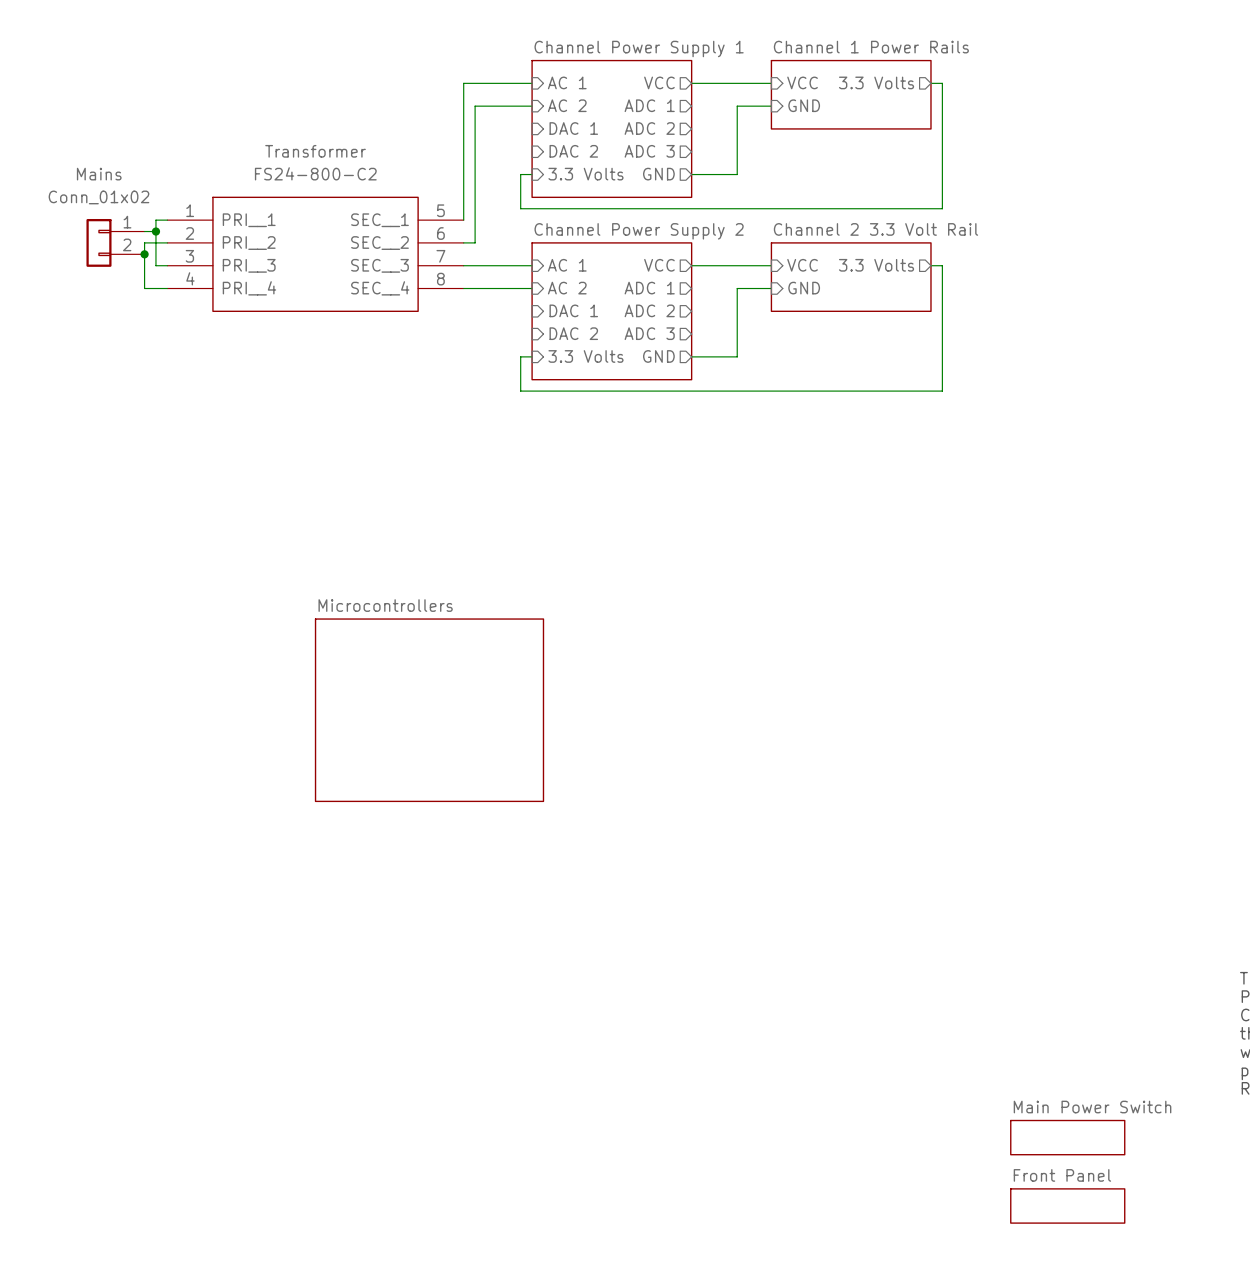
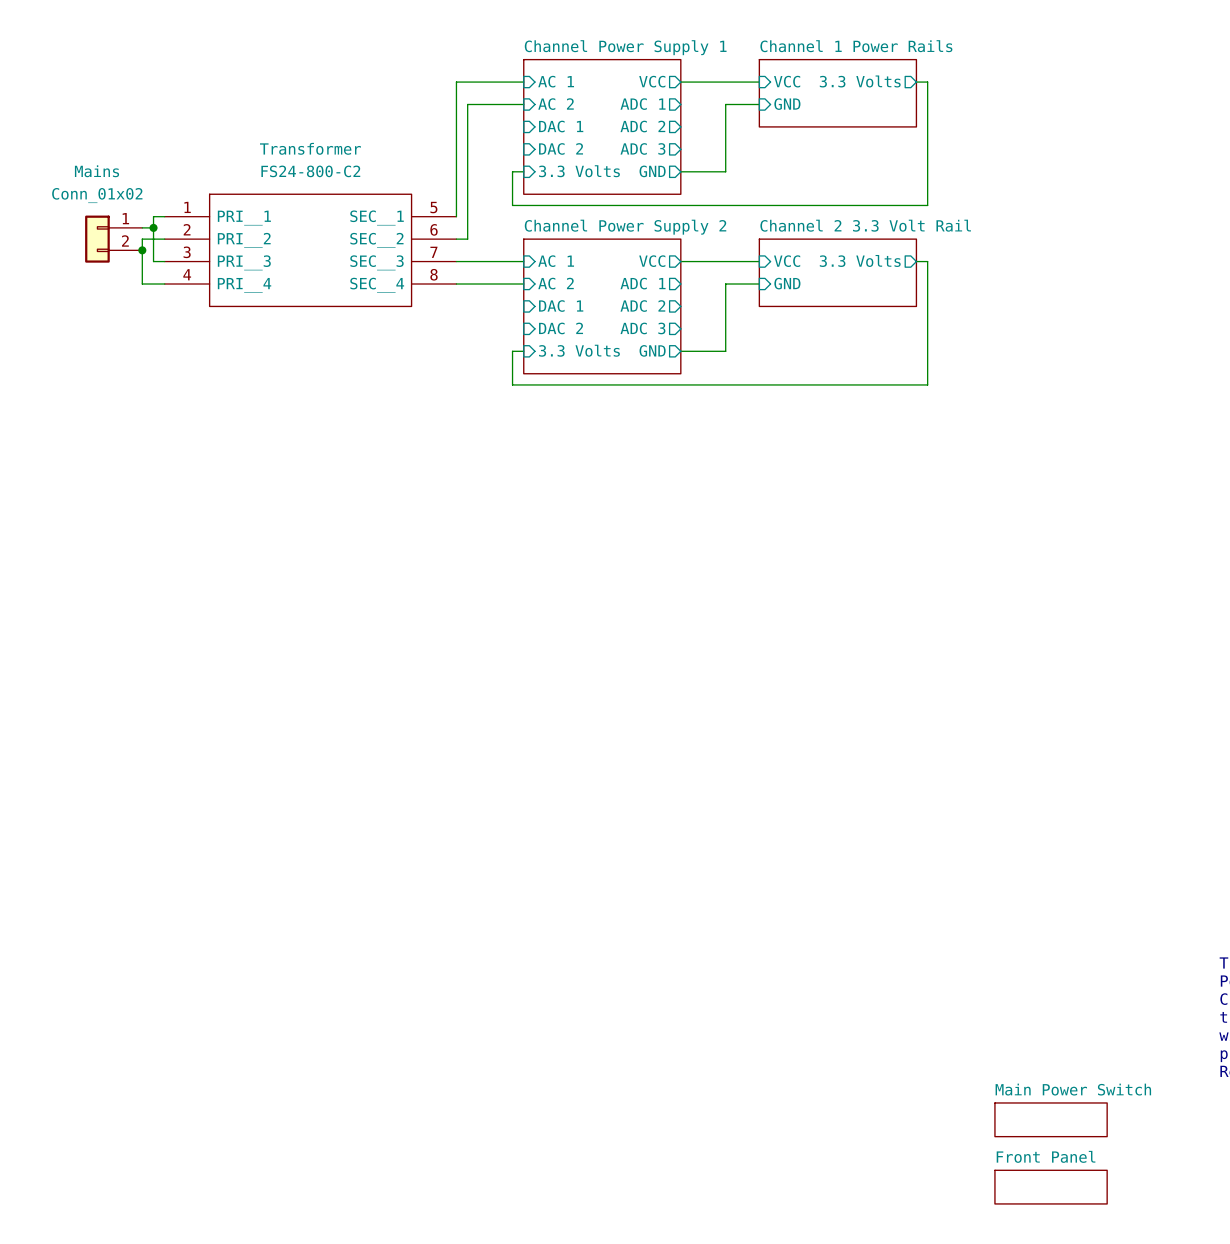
sheet Microcontrollers: (429, 710) -> none

